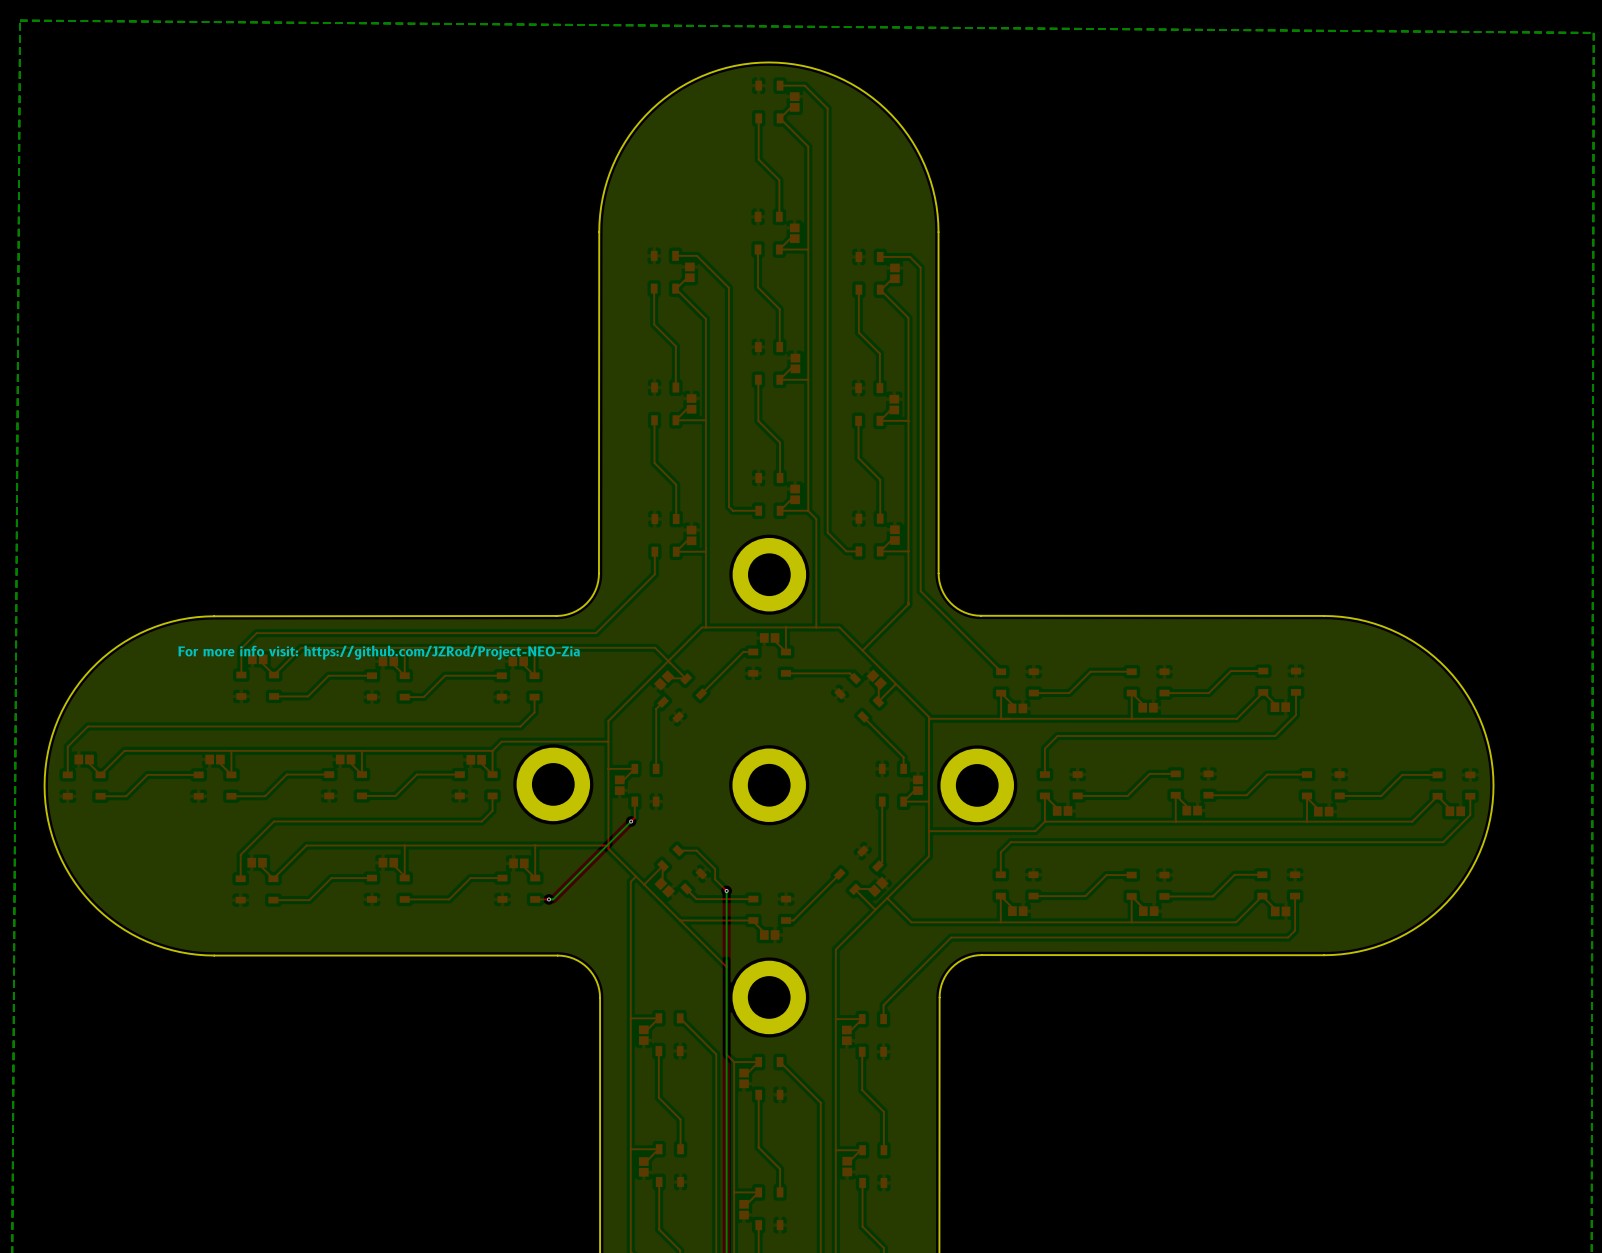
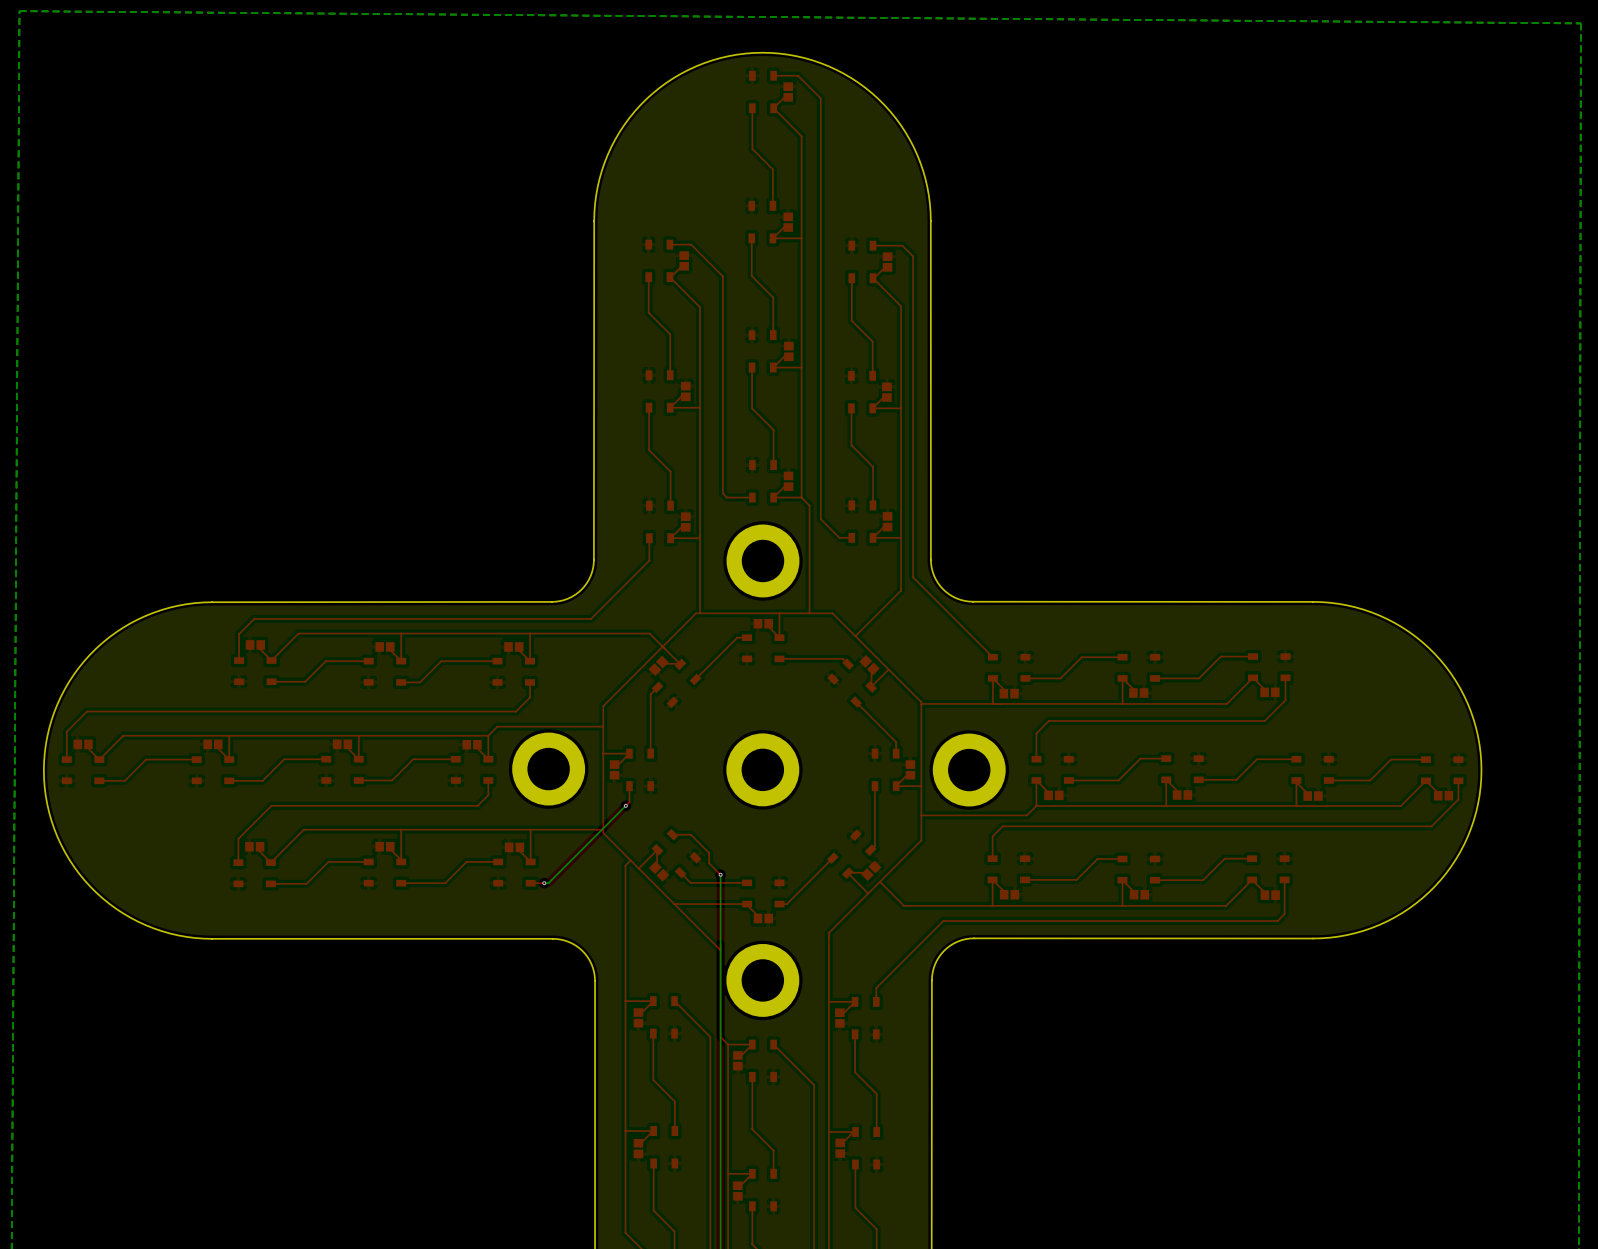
text: For more info visit: https://github.com/JZRod/Project-NEO-Zia (379, 652) -> none

